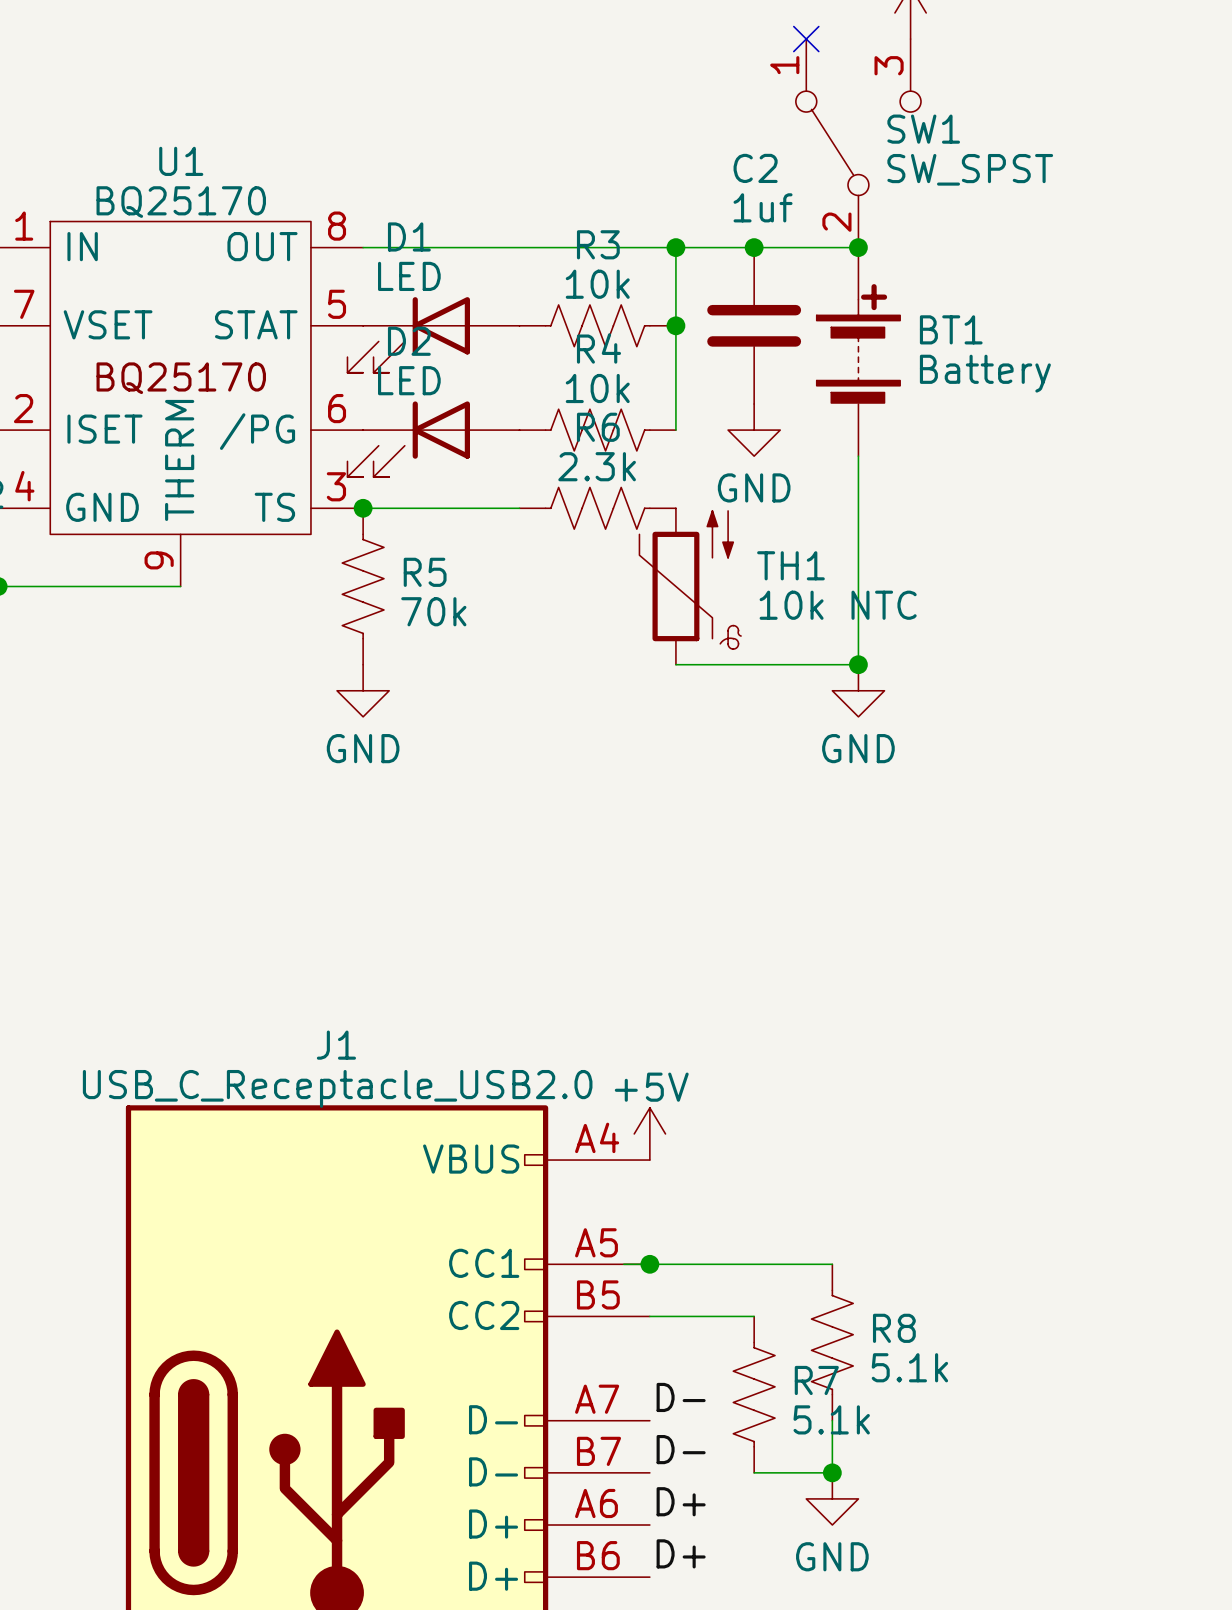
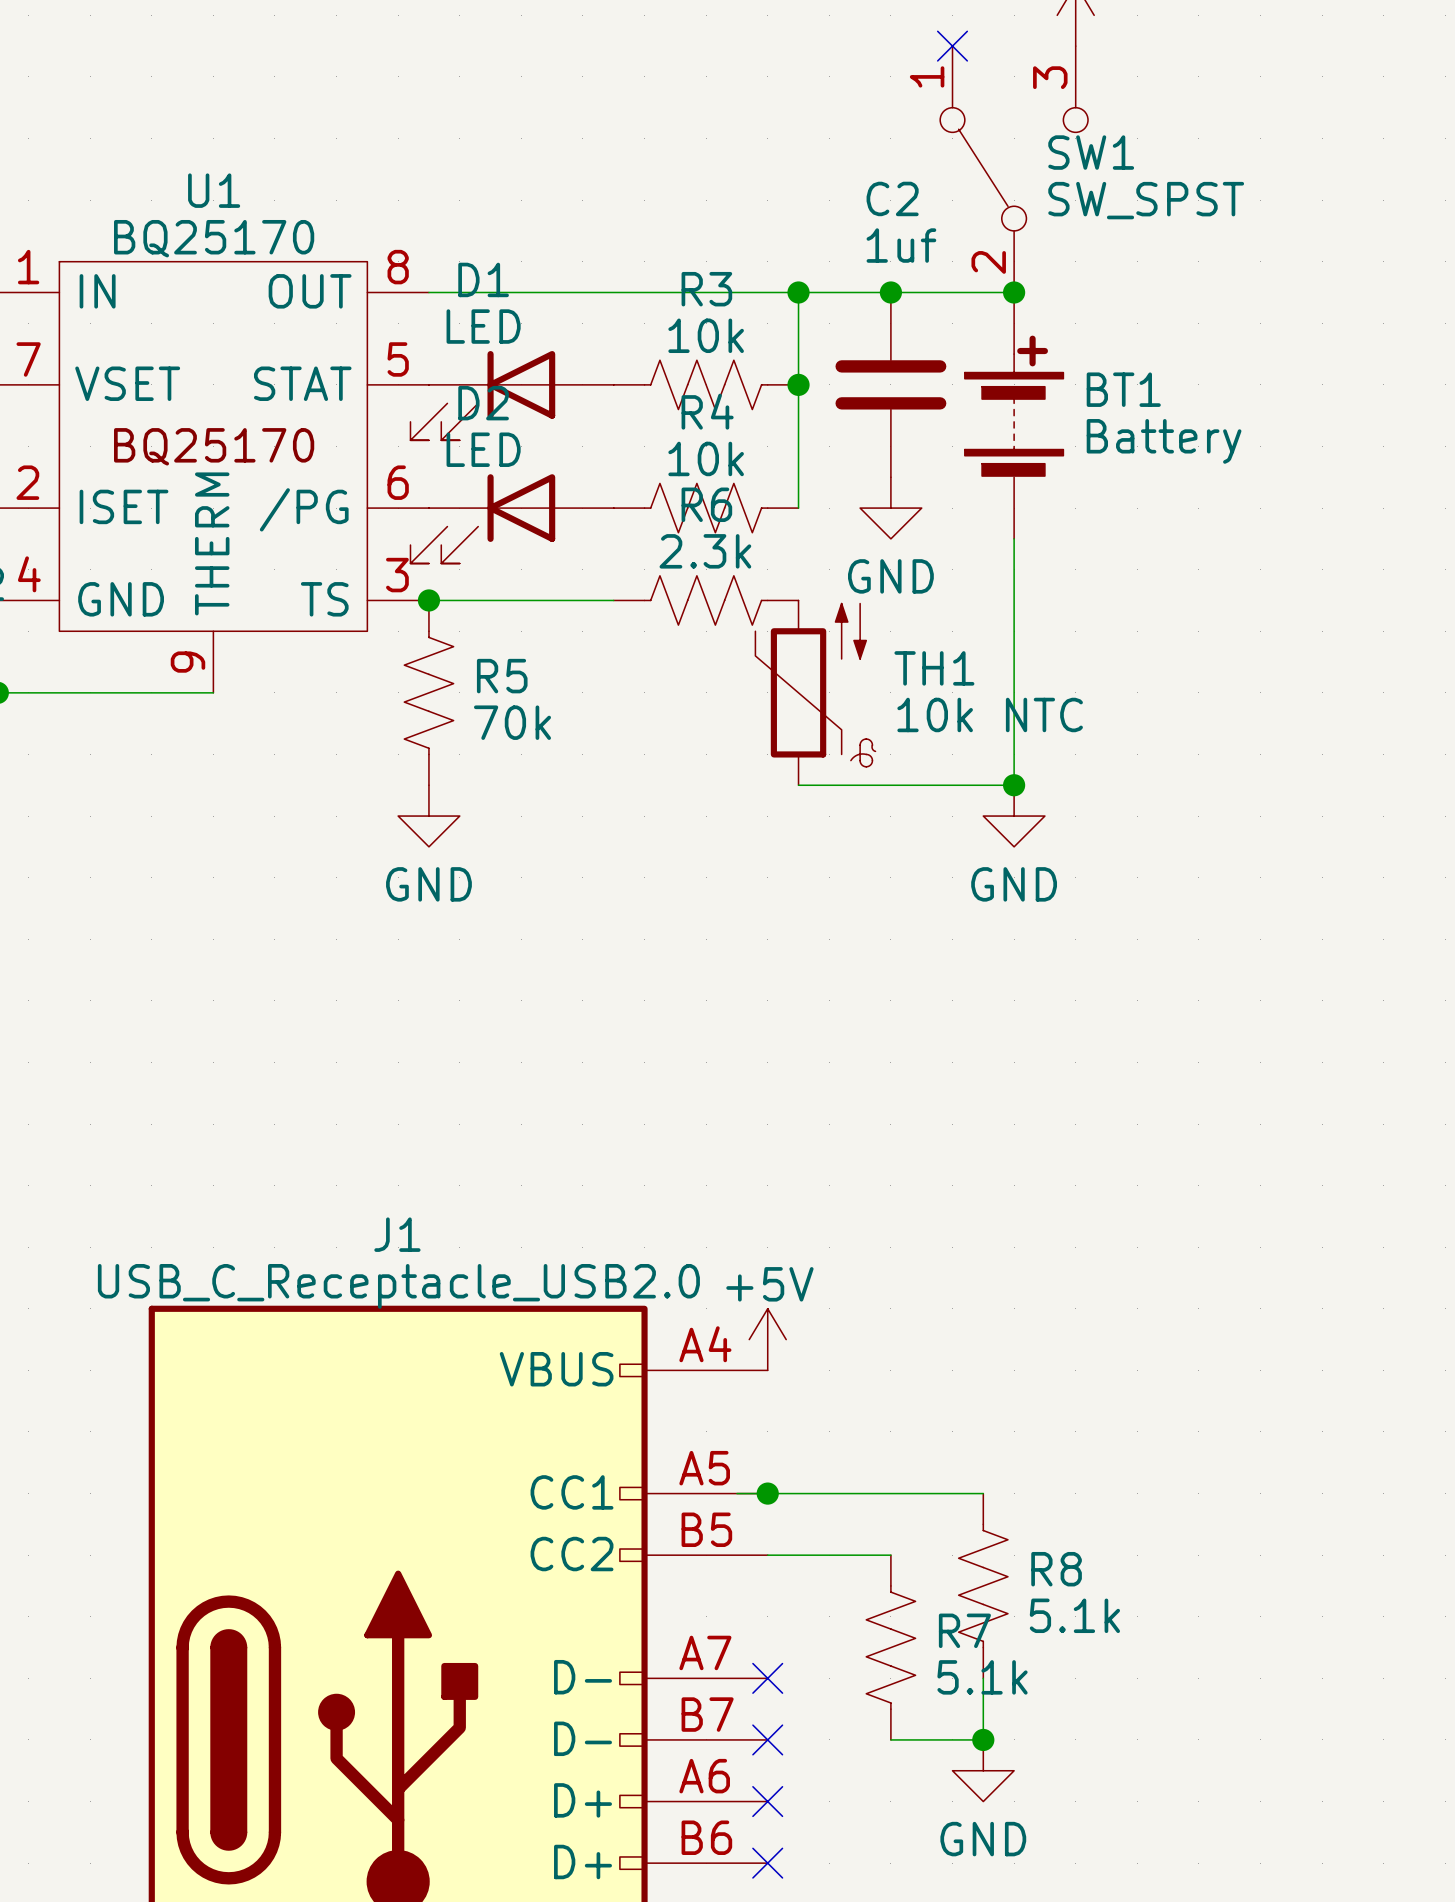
label: D- (681, 1397) -> none
no-connect mark: none -> (767, 1678)
label: D- (681, 1449) -> none
no-connect mark: none -> (767, 1739)
label: D+ (681, 1501) -> none
no-connect mark: none -> (767, 1801)
label: D+ (681, 1553) -> none
no-connect mark: none -> (767, 1863)

